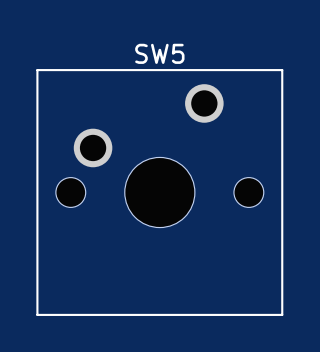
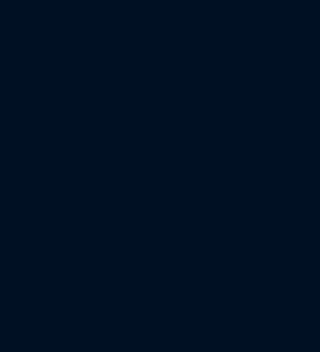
SW5: (159, 192) -> none

